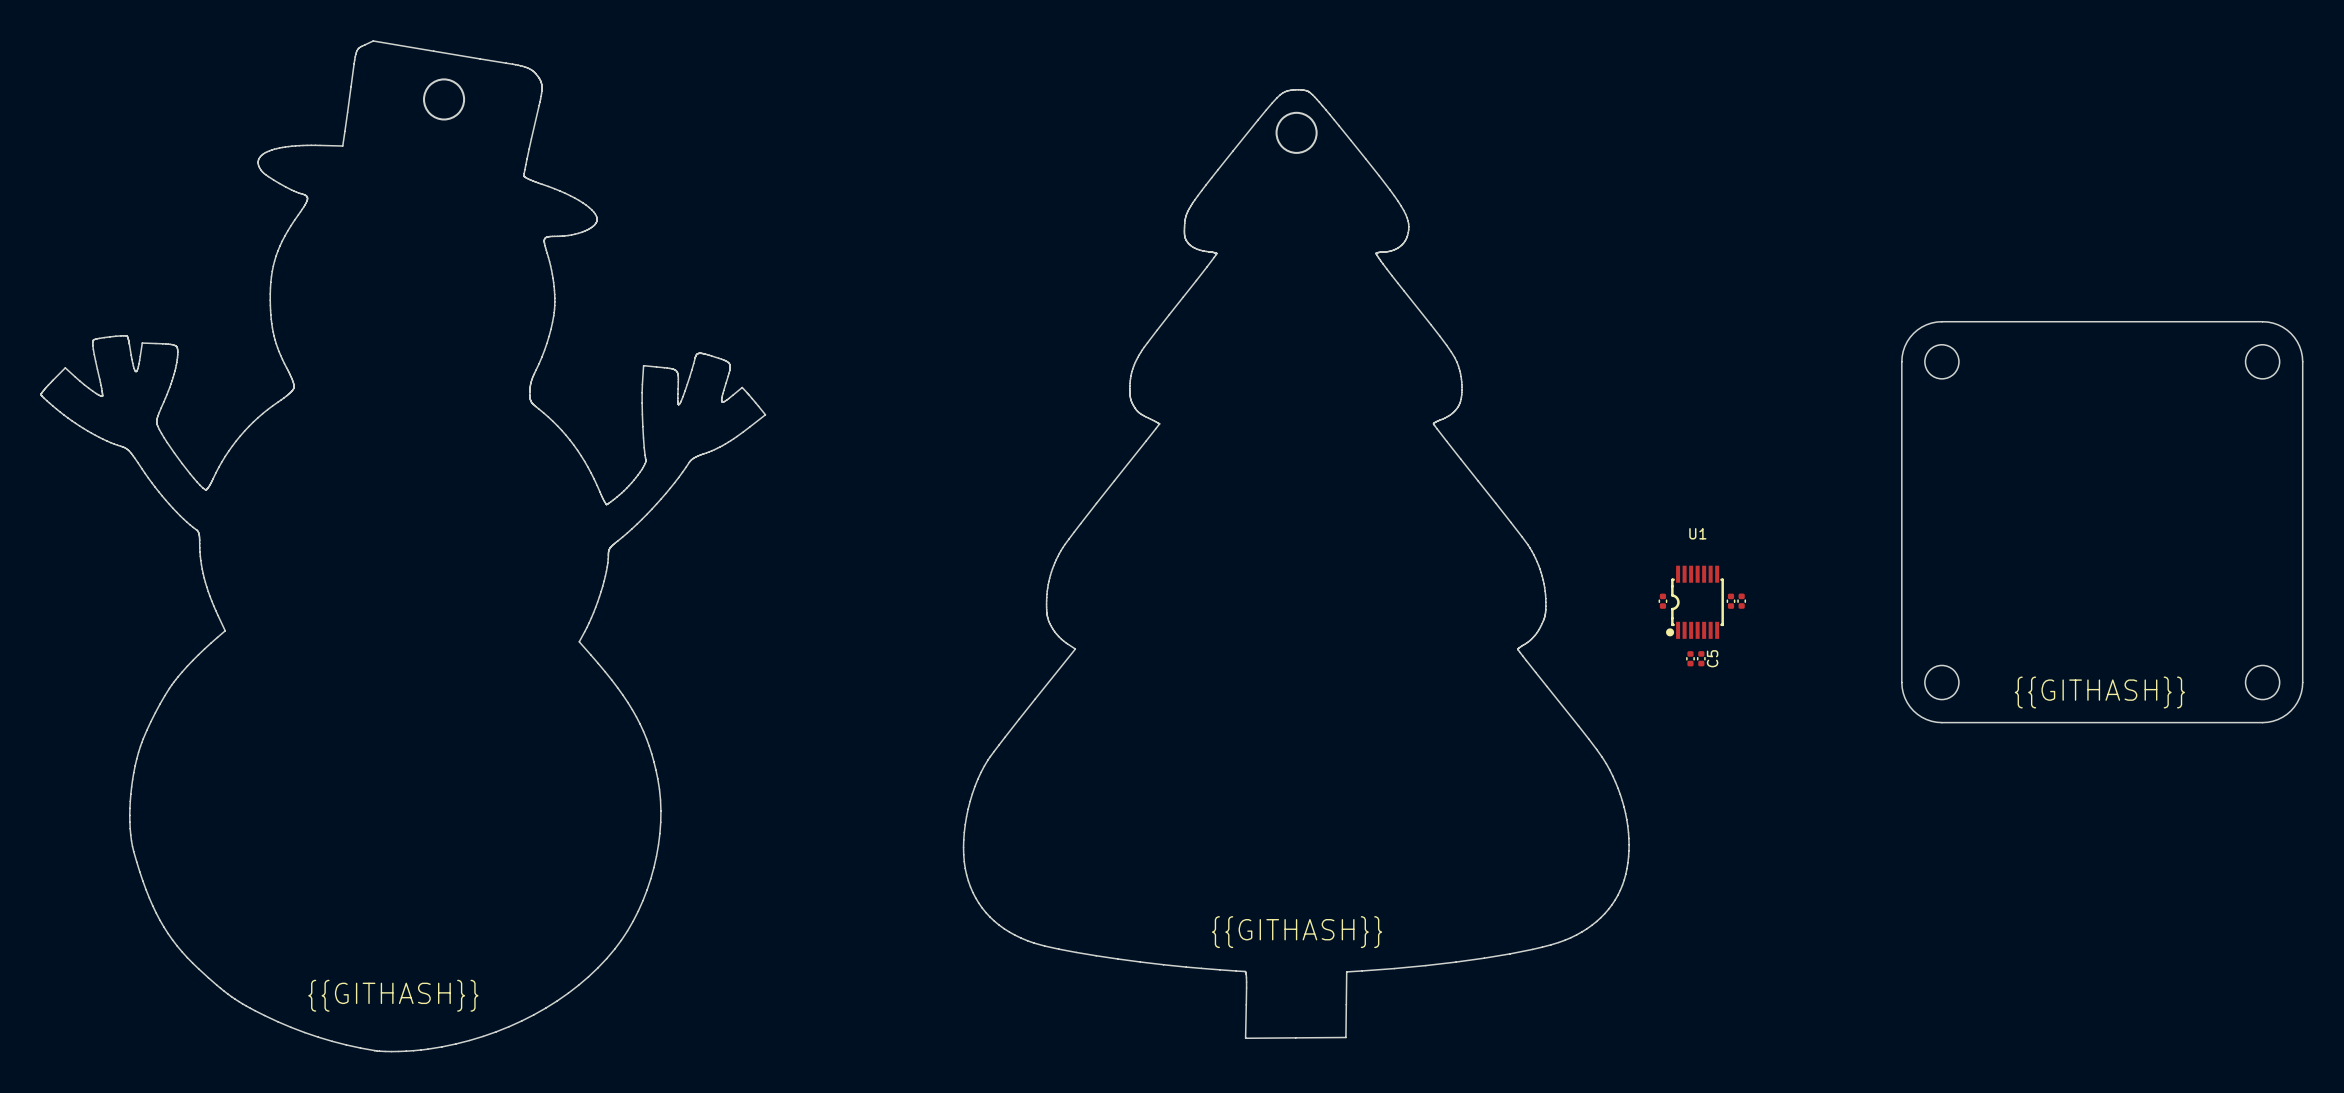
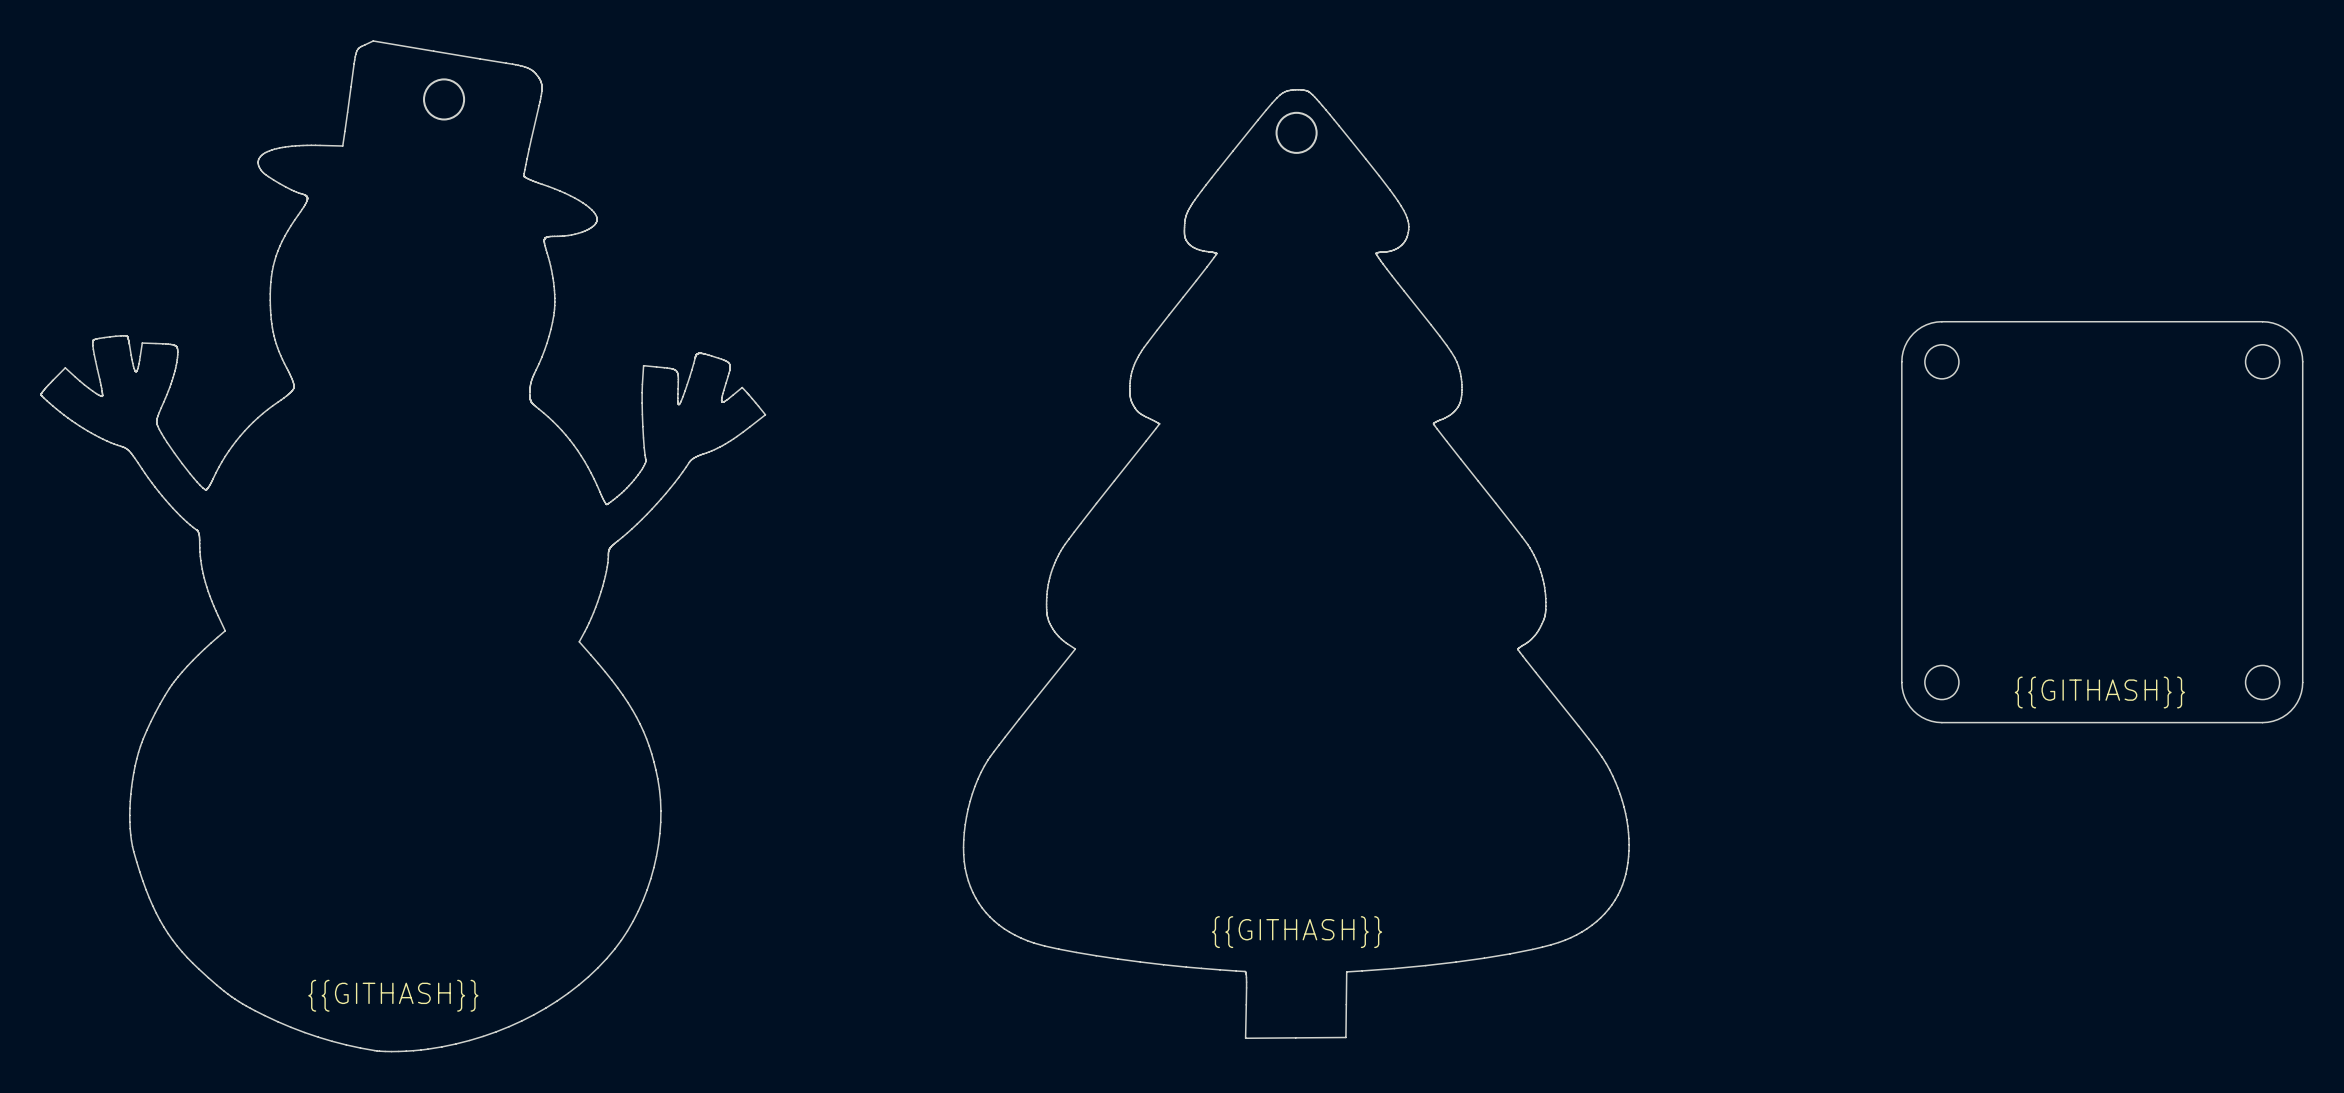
part: (1662, 601) -> none
part: (1730, 601) -> none
part: (1741, 601) -> none
U1: (1694, 602) -> none
part: (1690, 658) -> none
C5: (1701, 658) -> none

